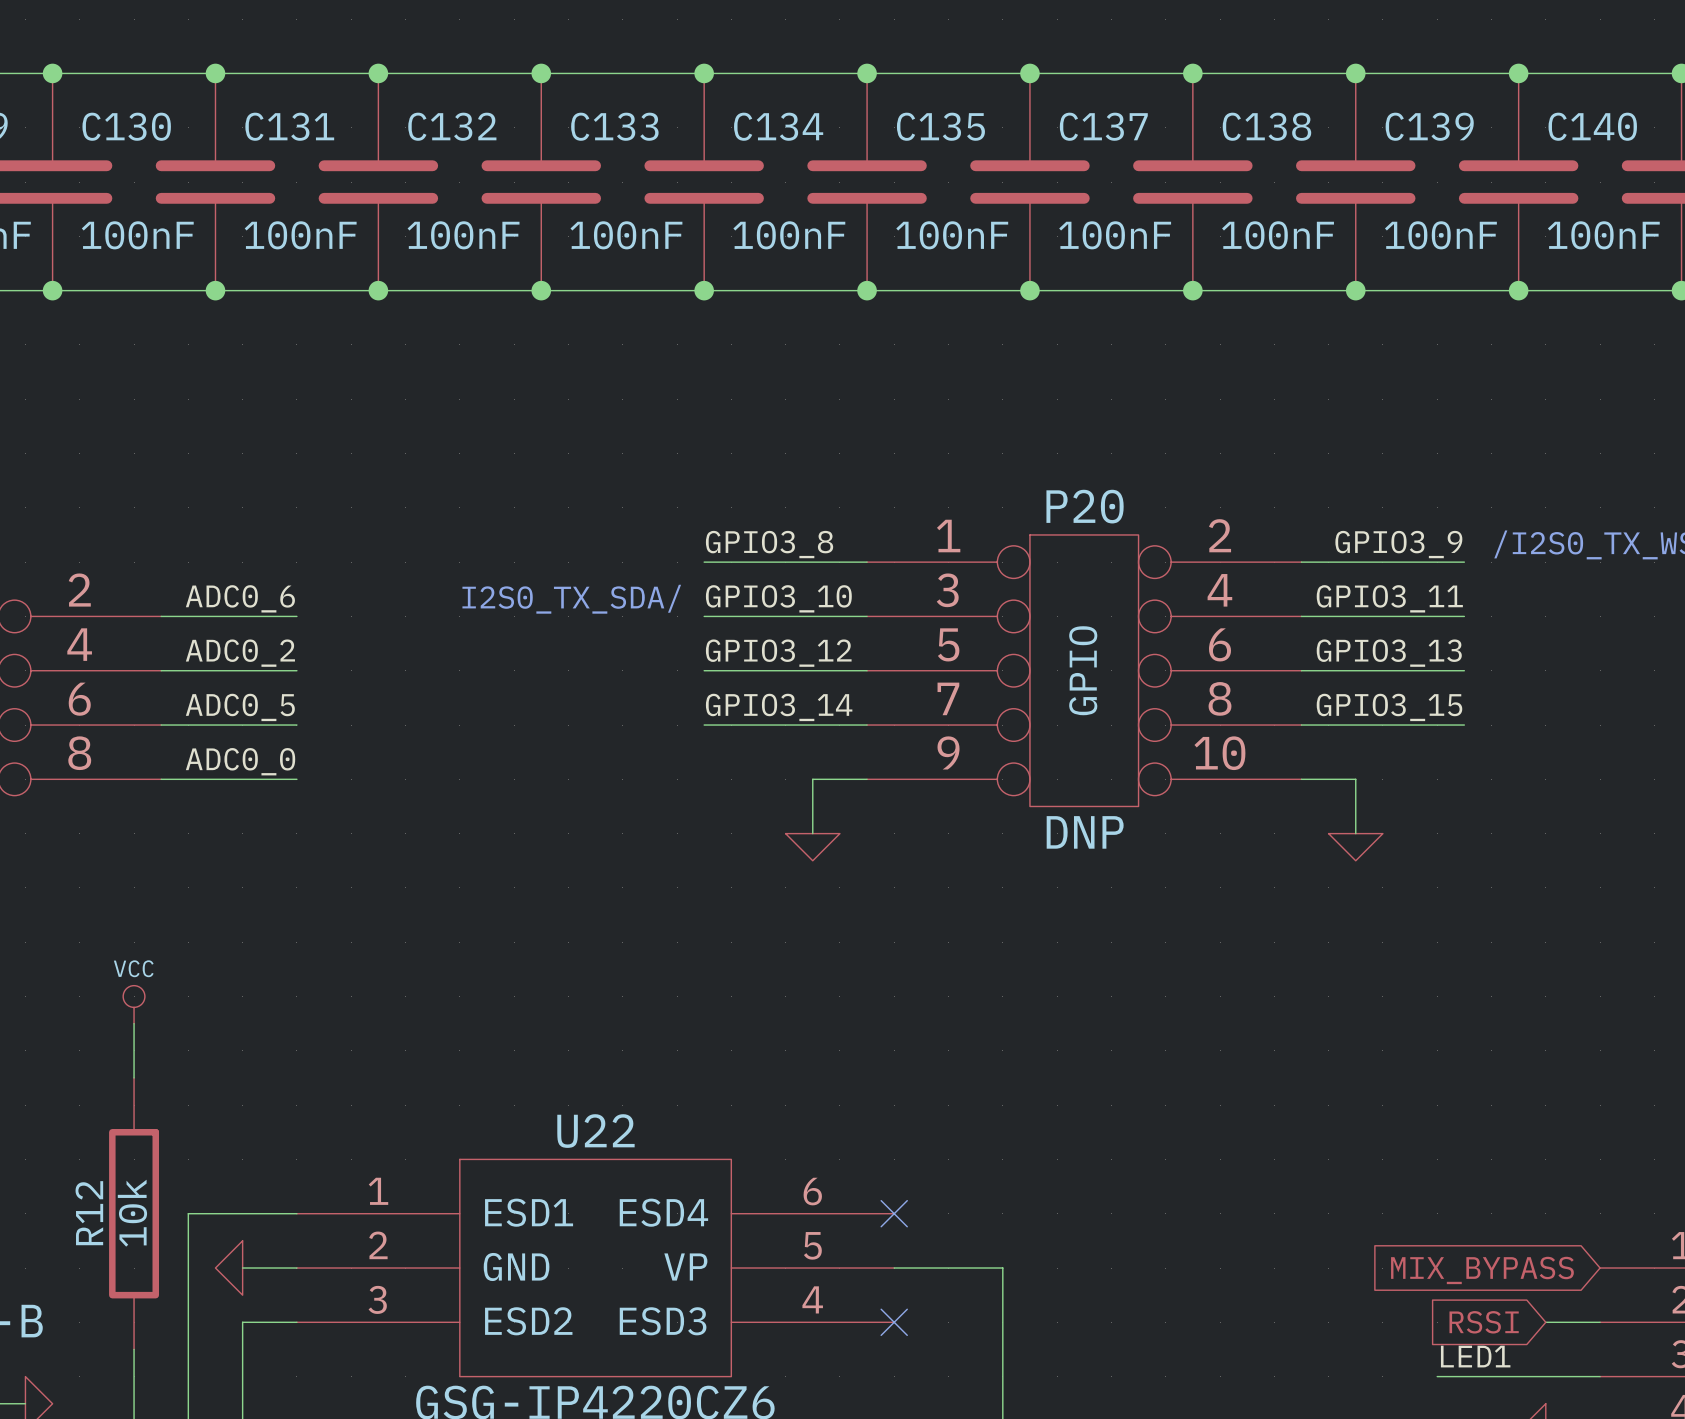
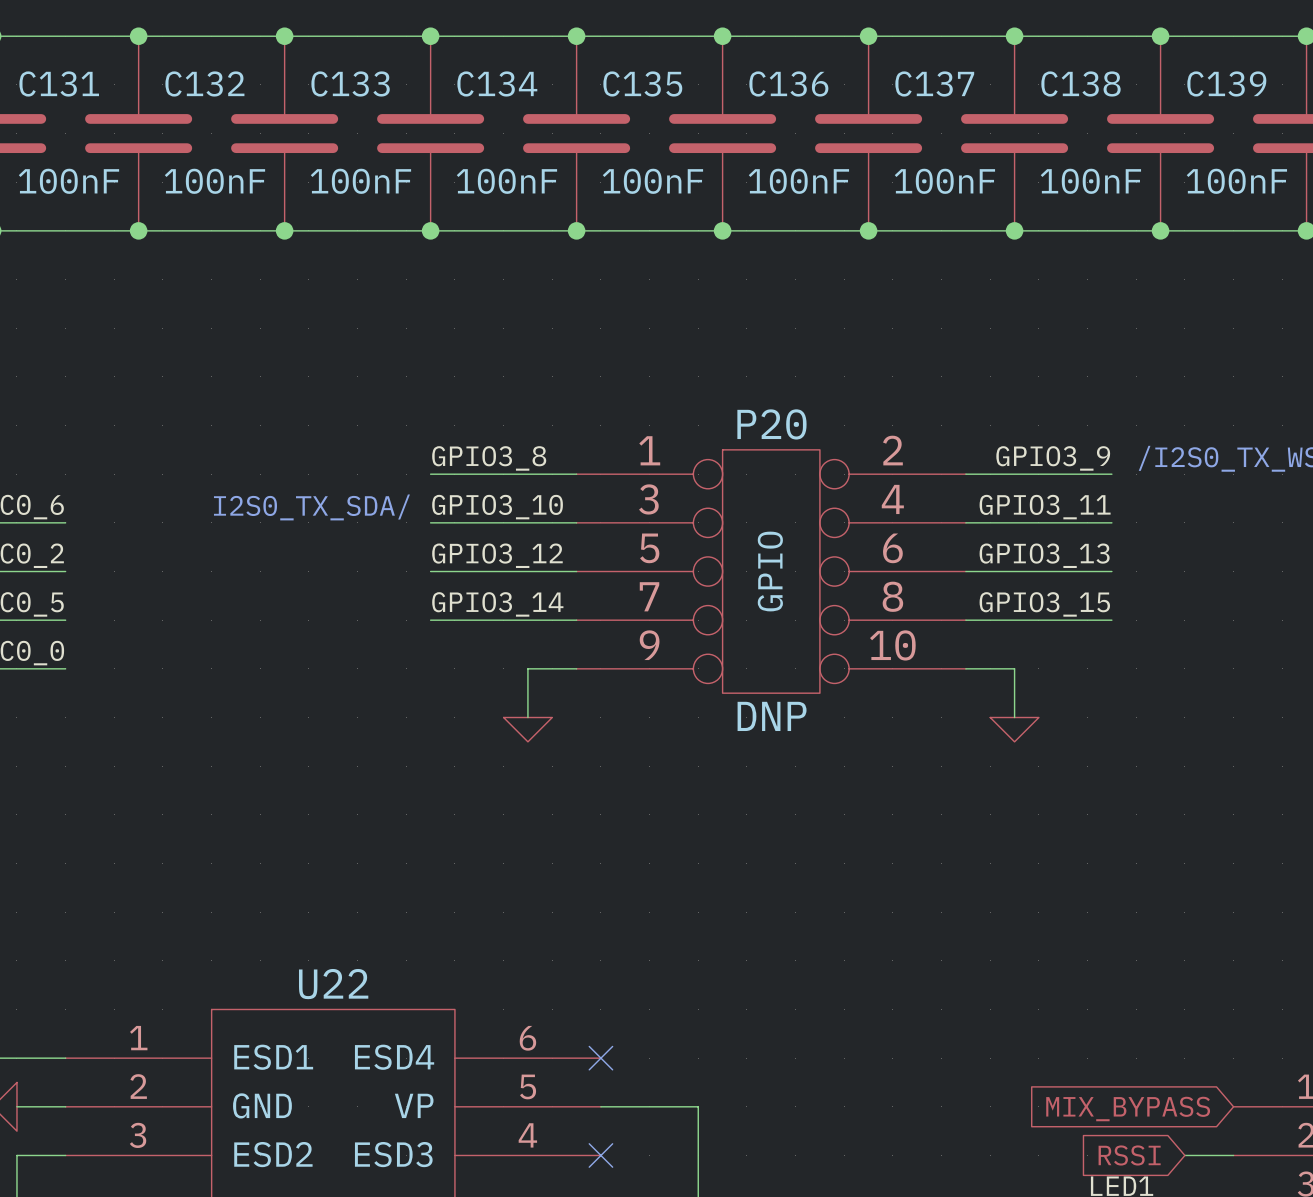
C137 name: C137 (1103, 126) -> C136 (788, 83)
C138 name: C138 (1266, 126) -> C137 (934, 83)
C139 name: C139 (1429, 126) -> C138 (1081, 83)
C140 name: C140 (1592, 126) -> C139 (1226, 83)

